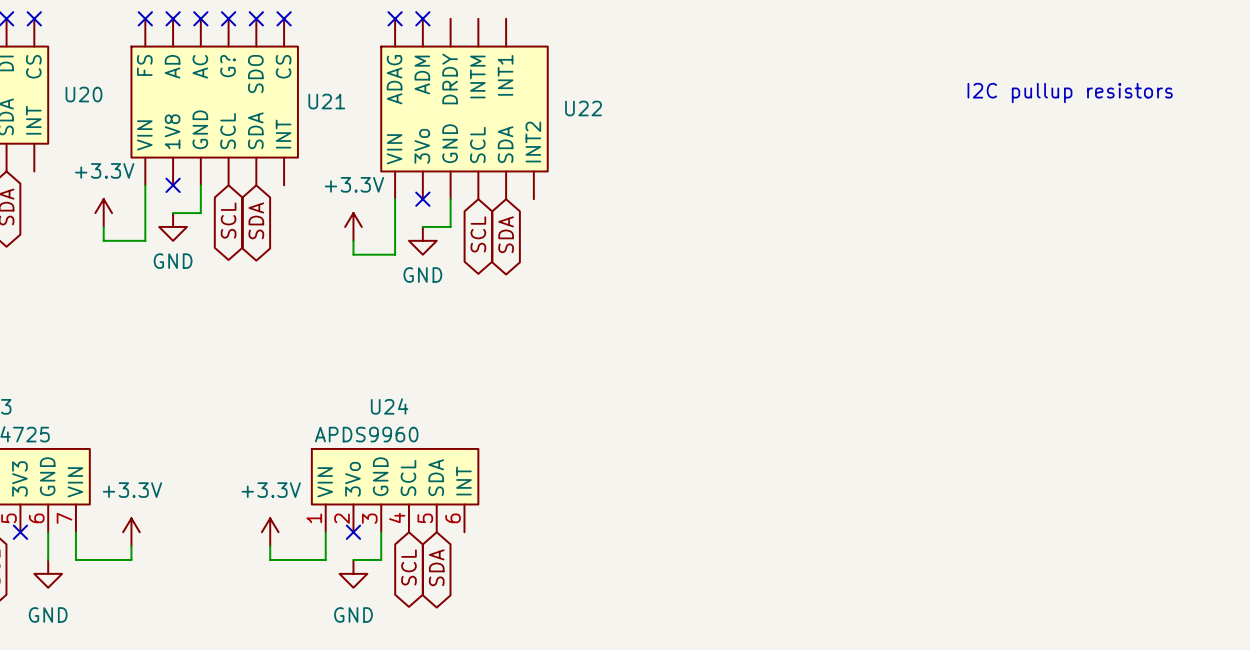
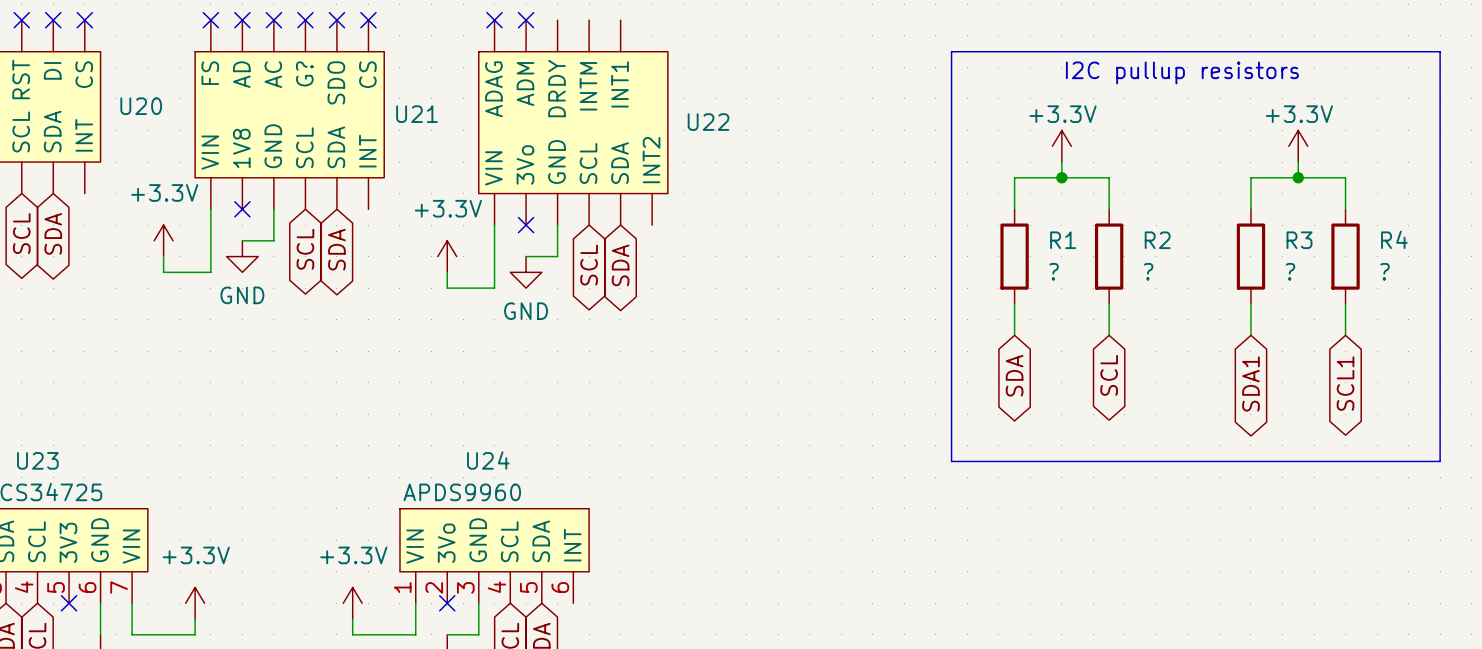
line: none -> (951, 51) (1440, 51) (1440, 461) (951, 461) (951, 51)
text position: I2C pullup resistors (1070, 93) -> I2C pullup resistors (1182, 72)
power symbol: none -> +3.3V (1061, 146)
power symbol: none -> +3.3V (1298, 146)
wire: none -> (1061, 162) (1061, 177)
wire: none -> (1298, 162) (1298, 177)
junction: none -> (1061, 177)
junction: none -> (1298, 177)
wire: none -> (1014, 209) (1014, 177) (1109, 177) (1109, 209)
wire: none -> (1250, 209) (1250, 177) (1345, 177) (1345, 209)
R1: none -> ? (1014, 256)
R2: none -> ? (1109, 256)
R3: none -> ? (1250, 256)
R4: none -> ? (1345, 256)
wire: none -> (1014, 303) (1014, 335)
wire: none -> (1109, 303) (1109, 335)
wire: none -> (1250, 303) (1250, 335)
wire: none -> (1345, 303) (1345, 335)
global label: none -> SDA (1014, 375)
global label: none -> SCL (1109, 375)
global label: none -> SCL1 (1345, 383)
global label: none -> SDA1 (1250, 384)

